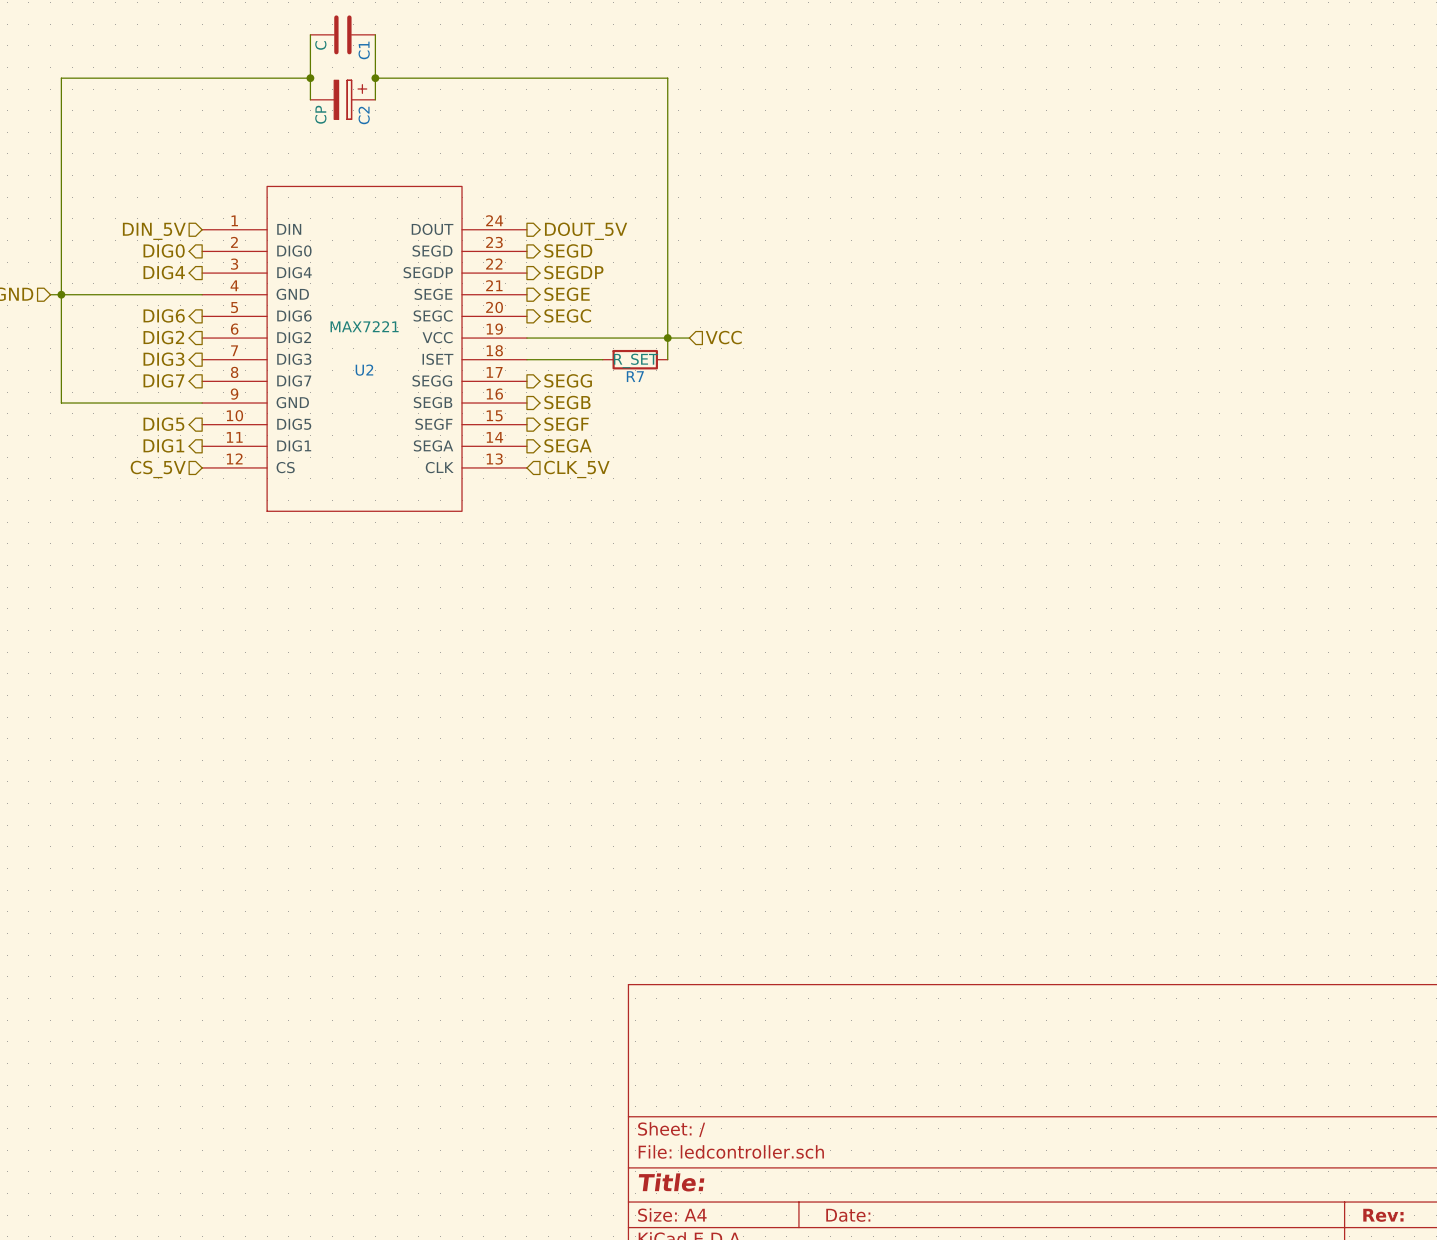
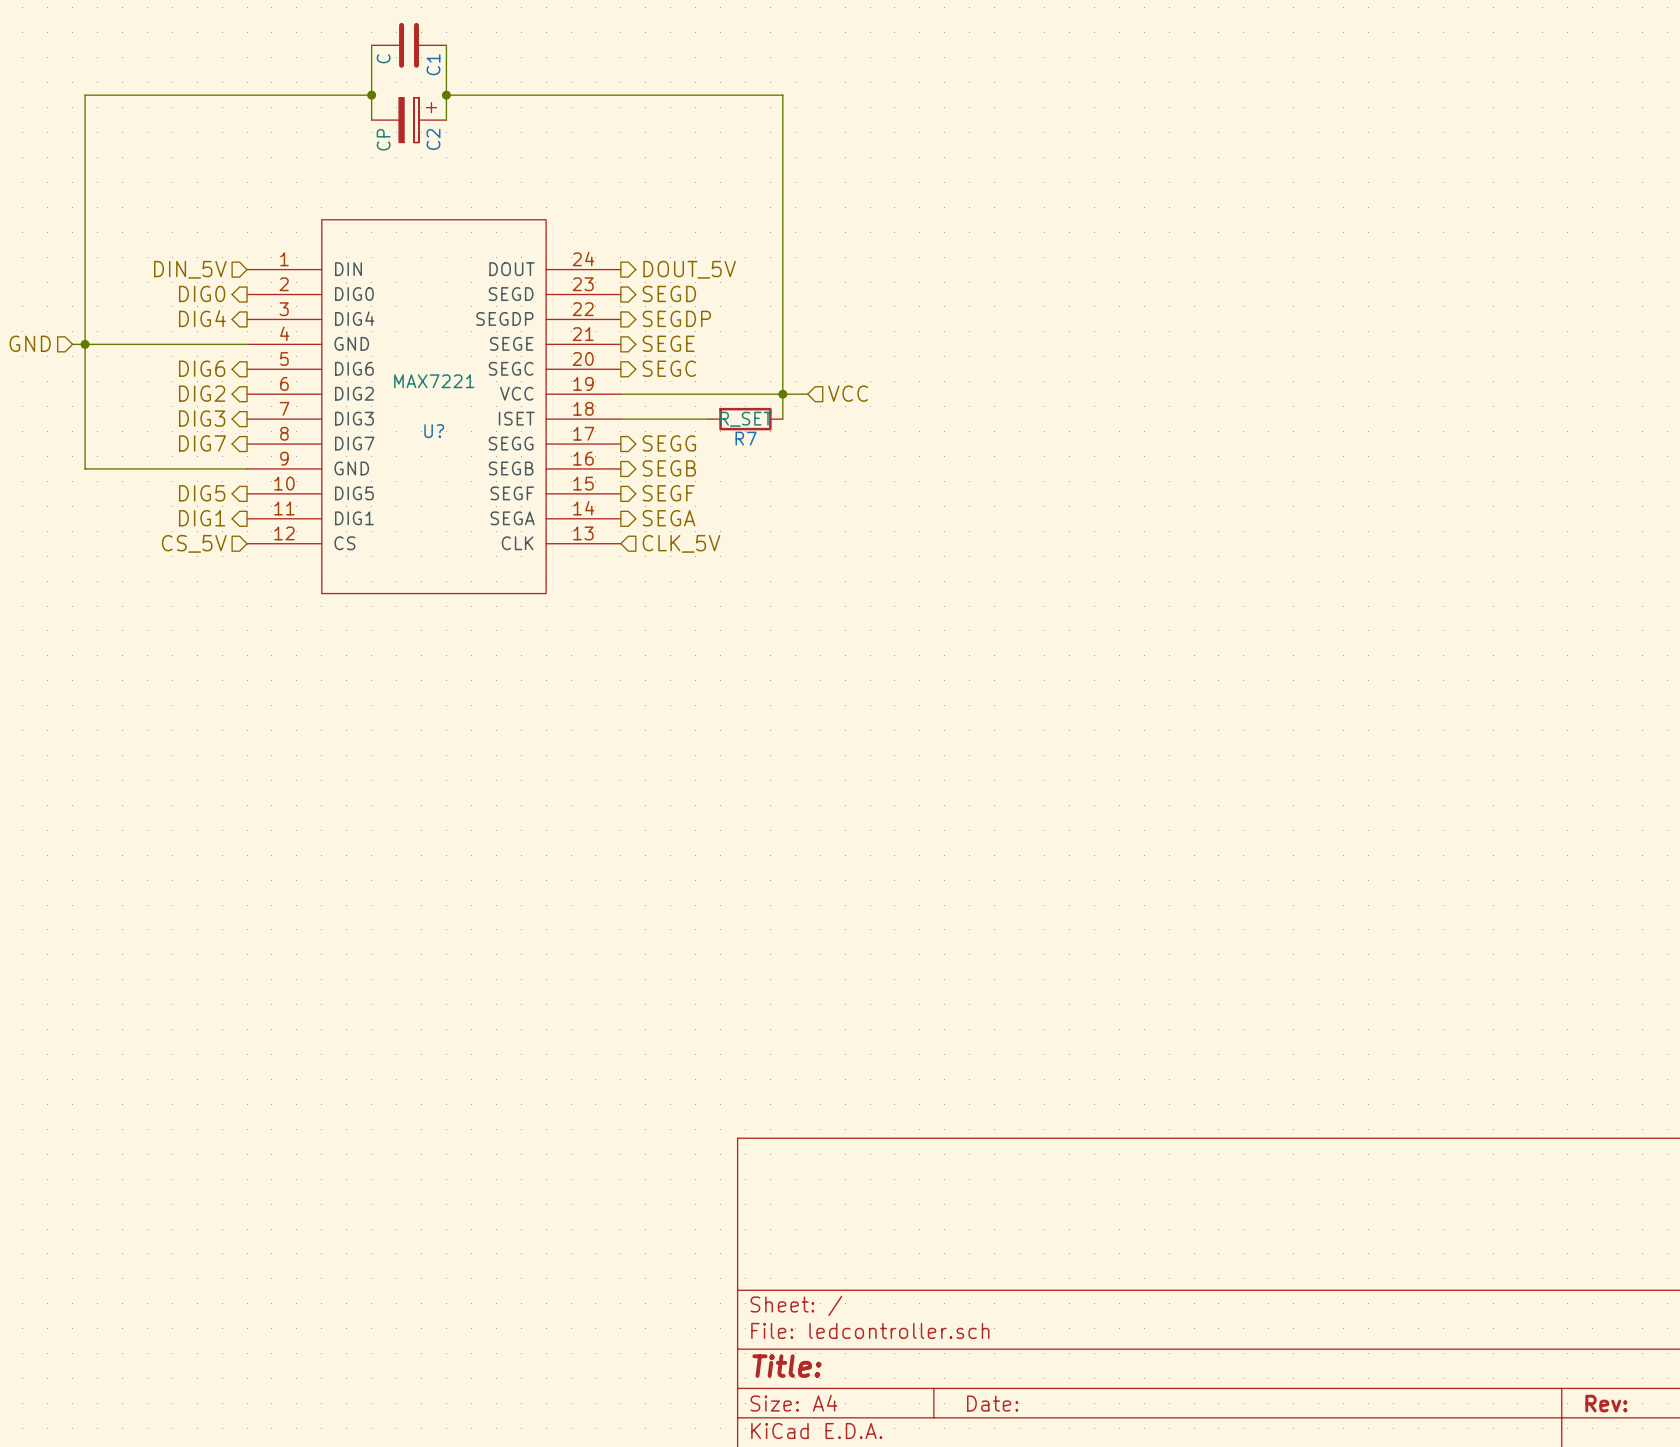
U2 name: U2 (364, 370) -> U? (434, 431)

